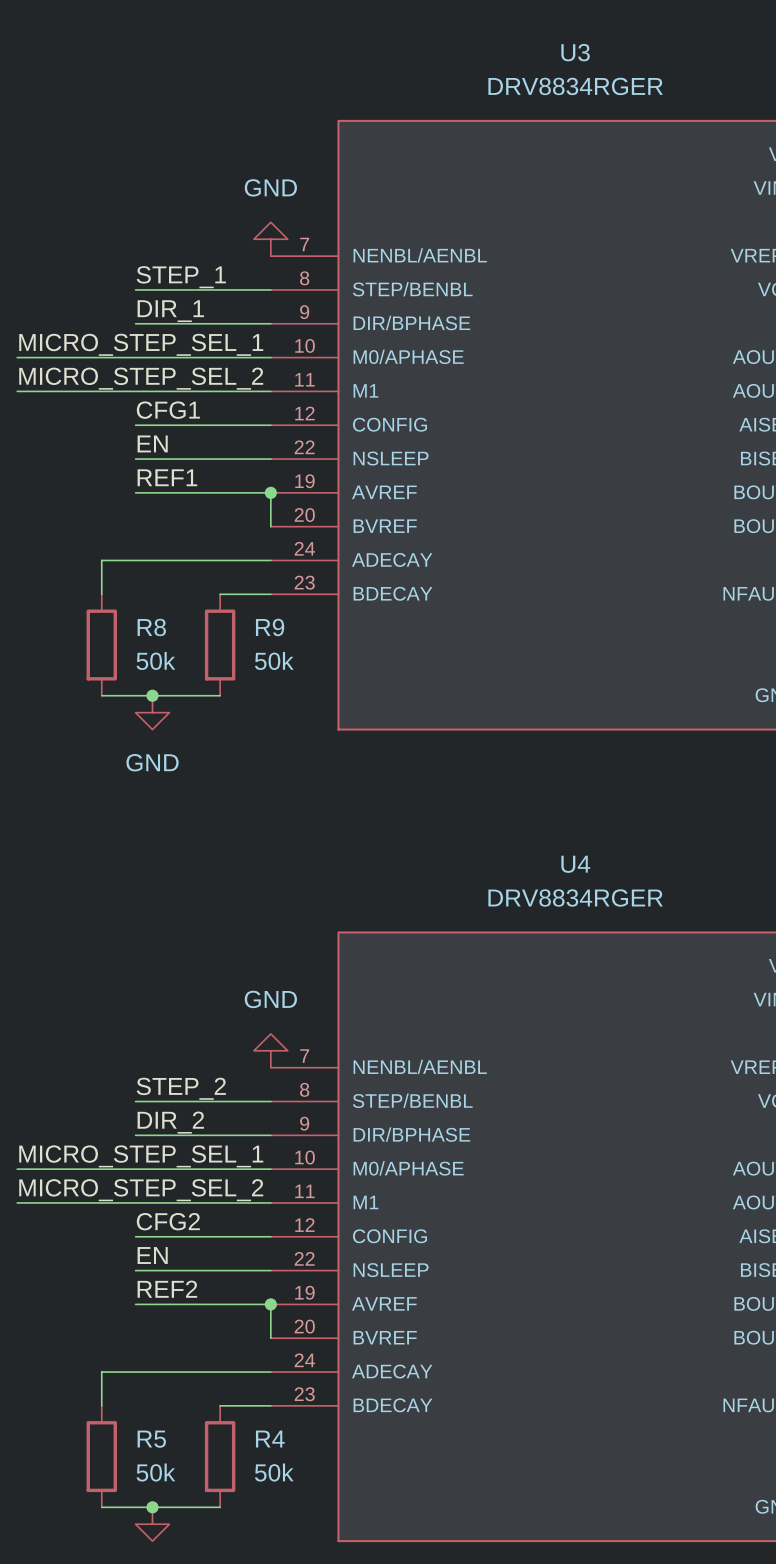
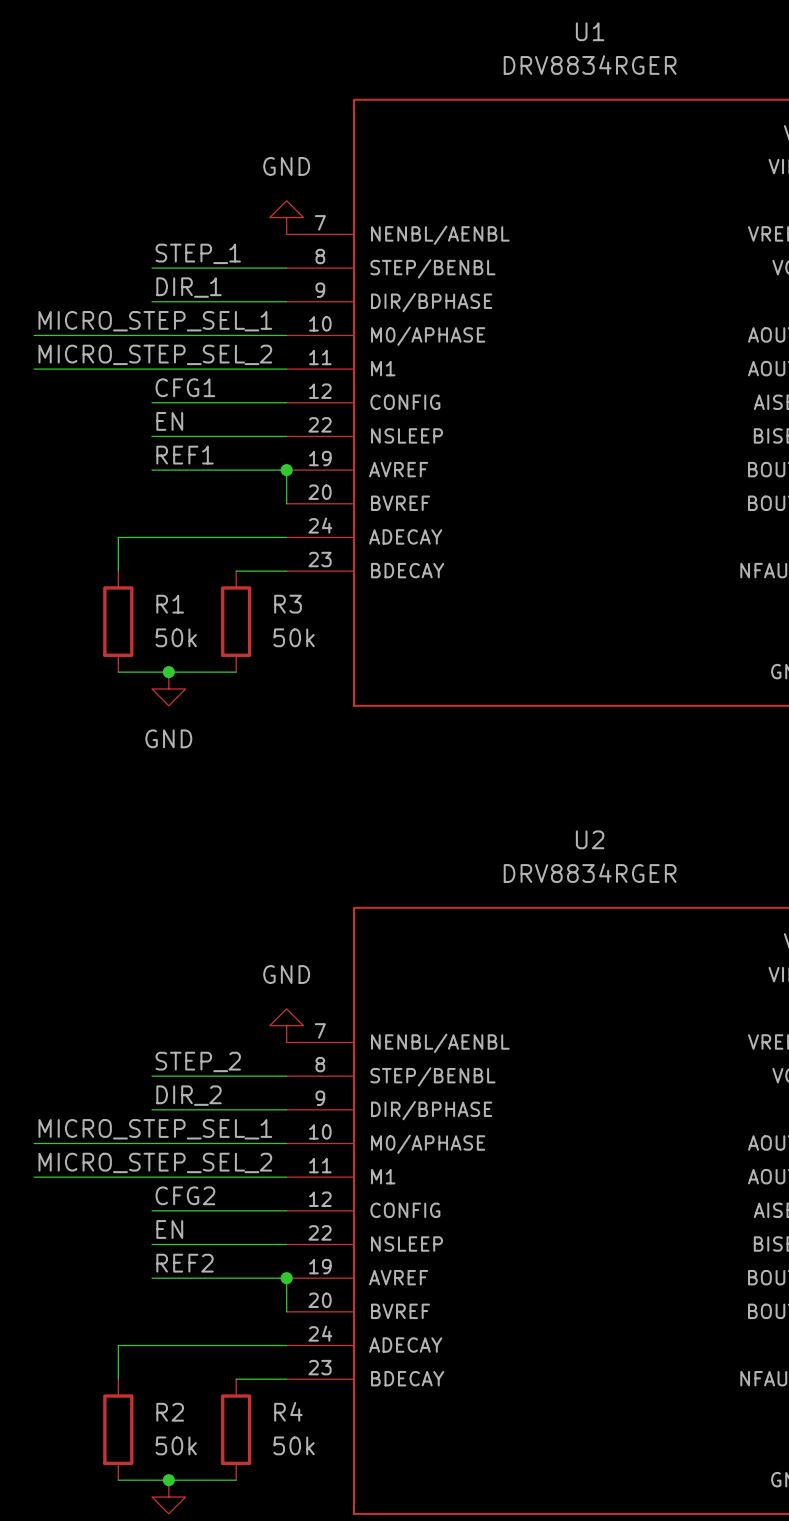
U3 name: U3 (575, 52) -> U1 (590, 31)
R8 name: R8 (151, 627) -> R1 (170, 604)
R9 name: R9 (270, 627) -> R3 (288, 604)
U4 name: U4 (575, 864) -> U2 (590, 839)
R5 name: R5 (151, 1439) -> R2 (170, 1412)

